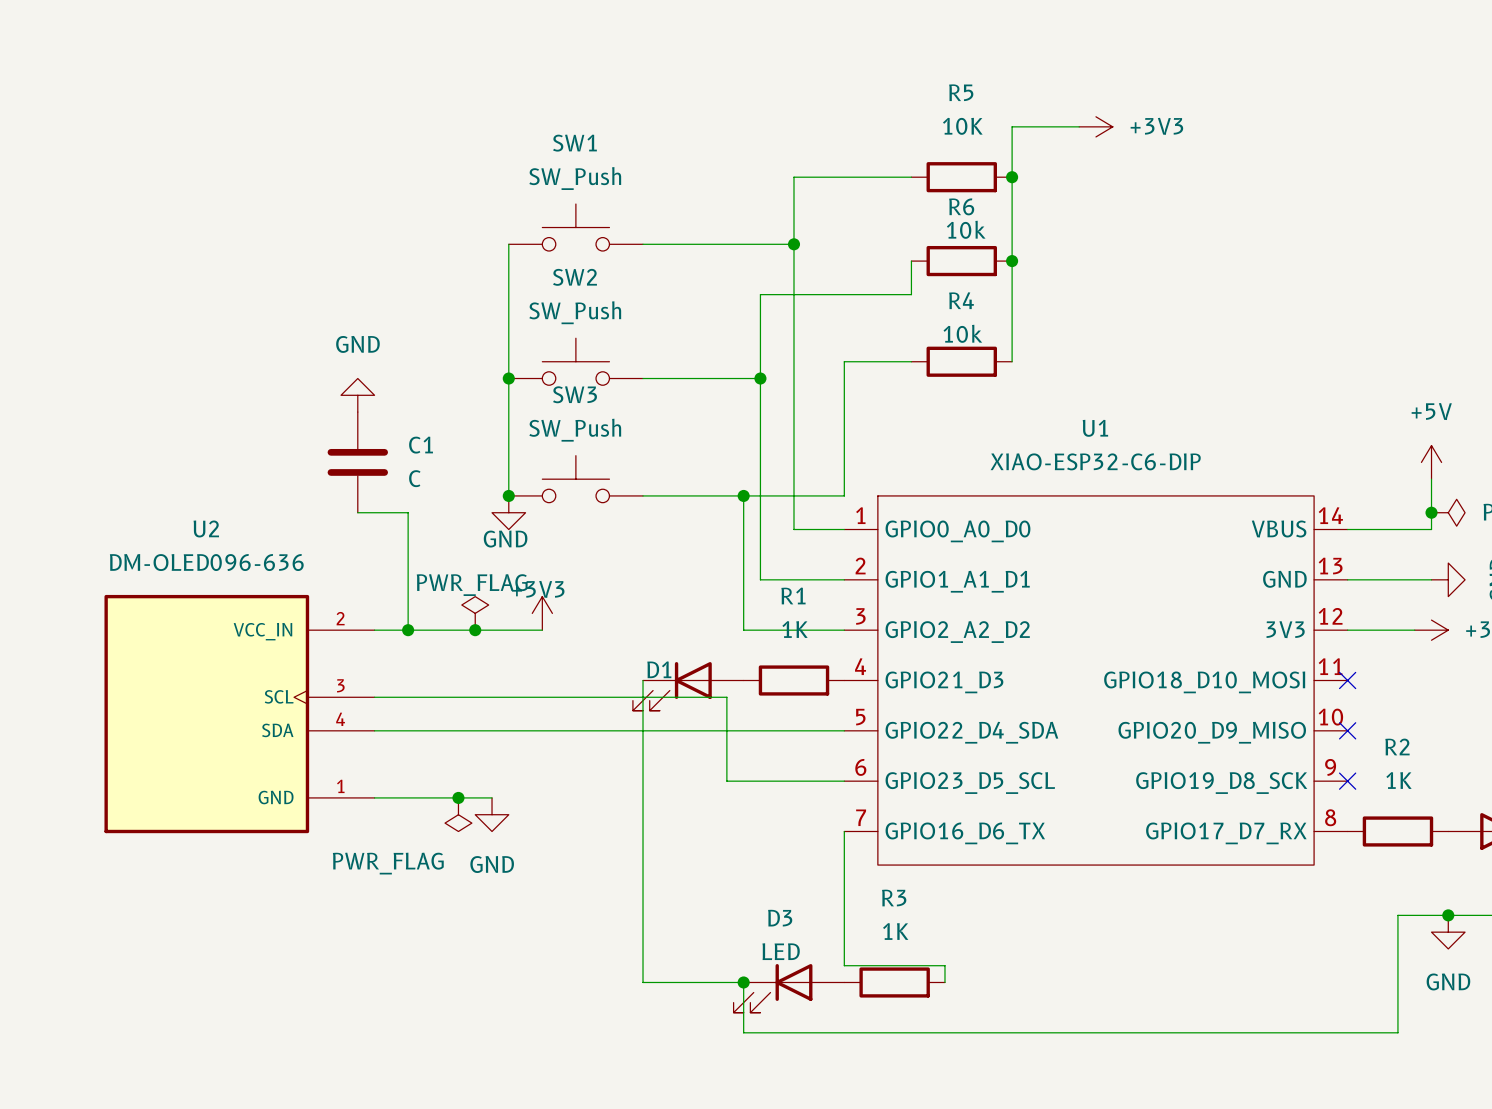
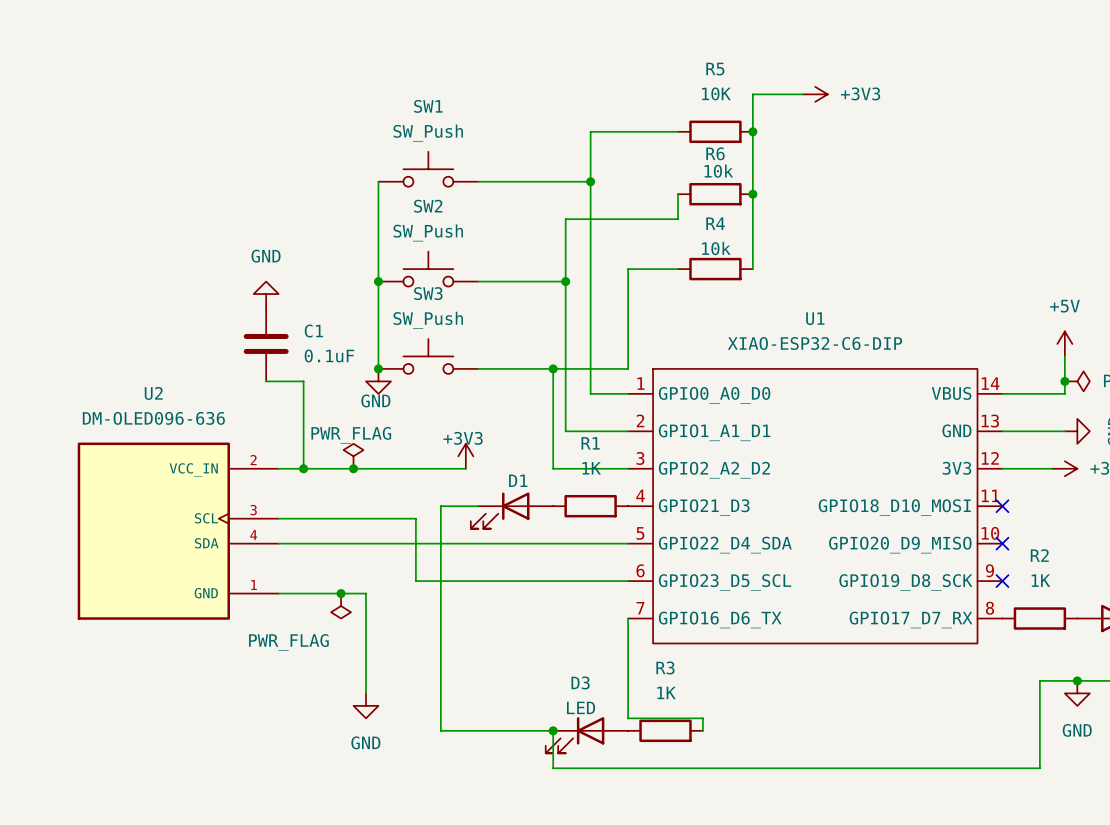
C1 value: C (414, 478) -> 0.1uF (329, 355)
power symbol position: +3V3 (542, 613) -> +3V3 (465, 456)
wire: none -> (403, 468) (465, 468)
D1 name position: D1 (659, 669) -> D1 (518, 480)
wire: (643, 680) (643, 982) -> (478, 506) (440, 506) (440, 730) (478, 730)
wire: (559, 697) (726, 697) (726, 781) -> (415, 518) (415, 581) (540, 581)
wire: none -> (365, 593) (365, 693)
power symbol position: GND (492, 814) -> GND (365, 705)

